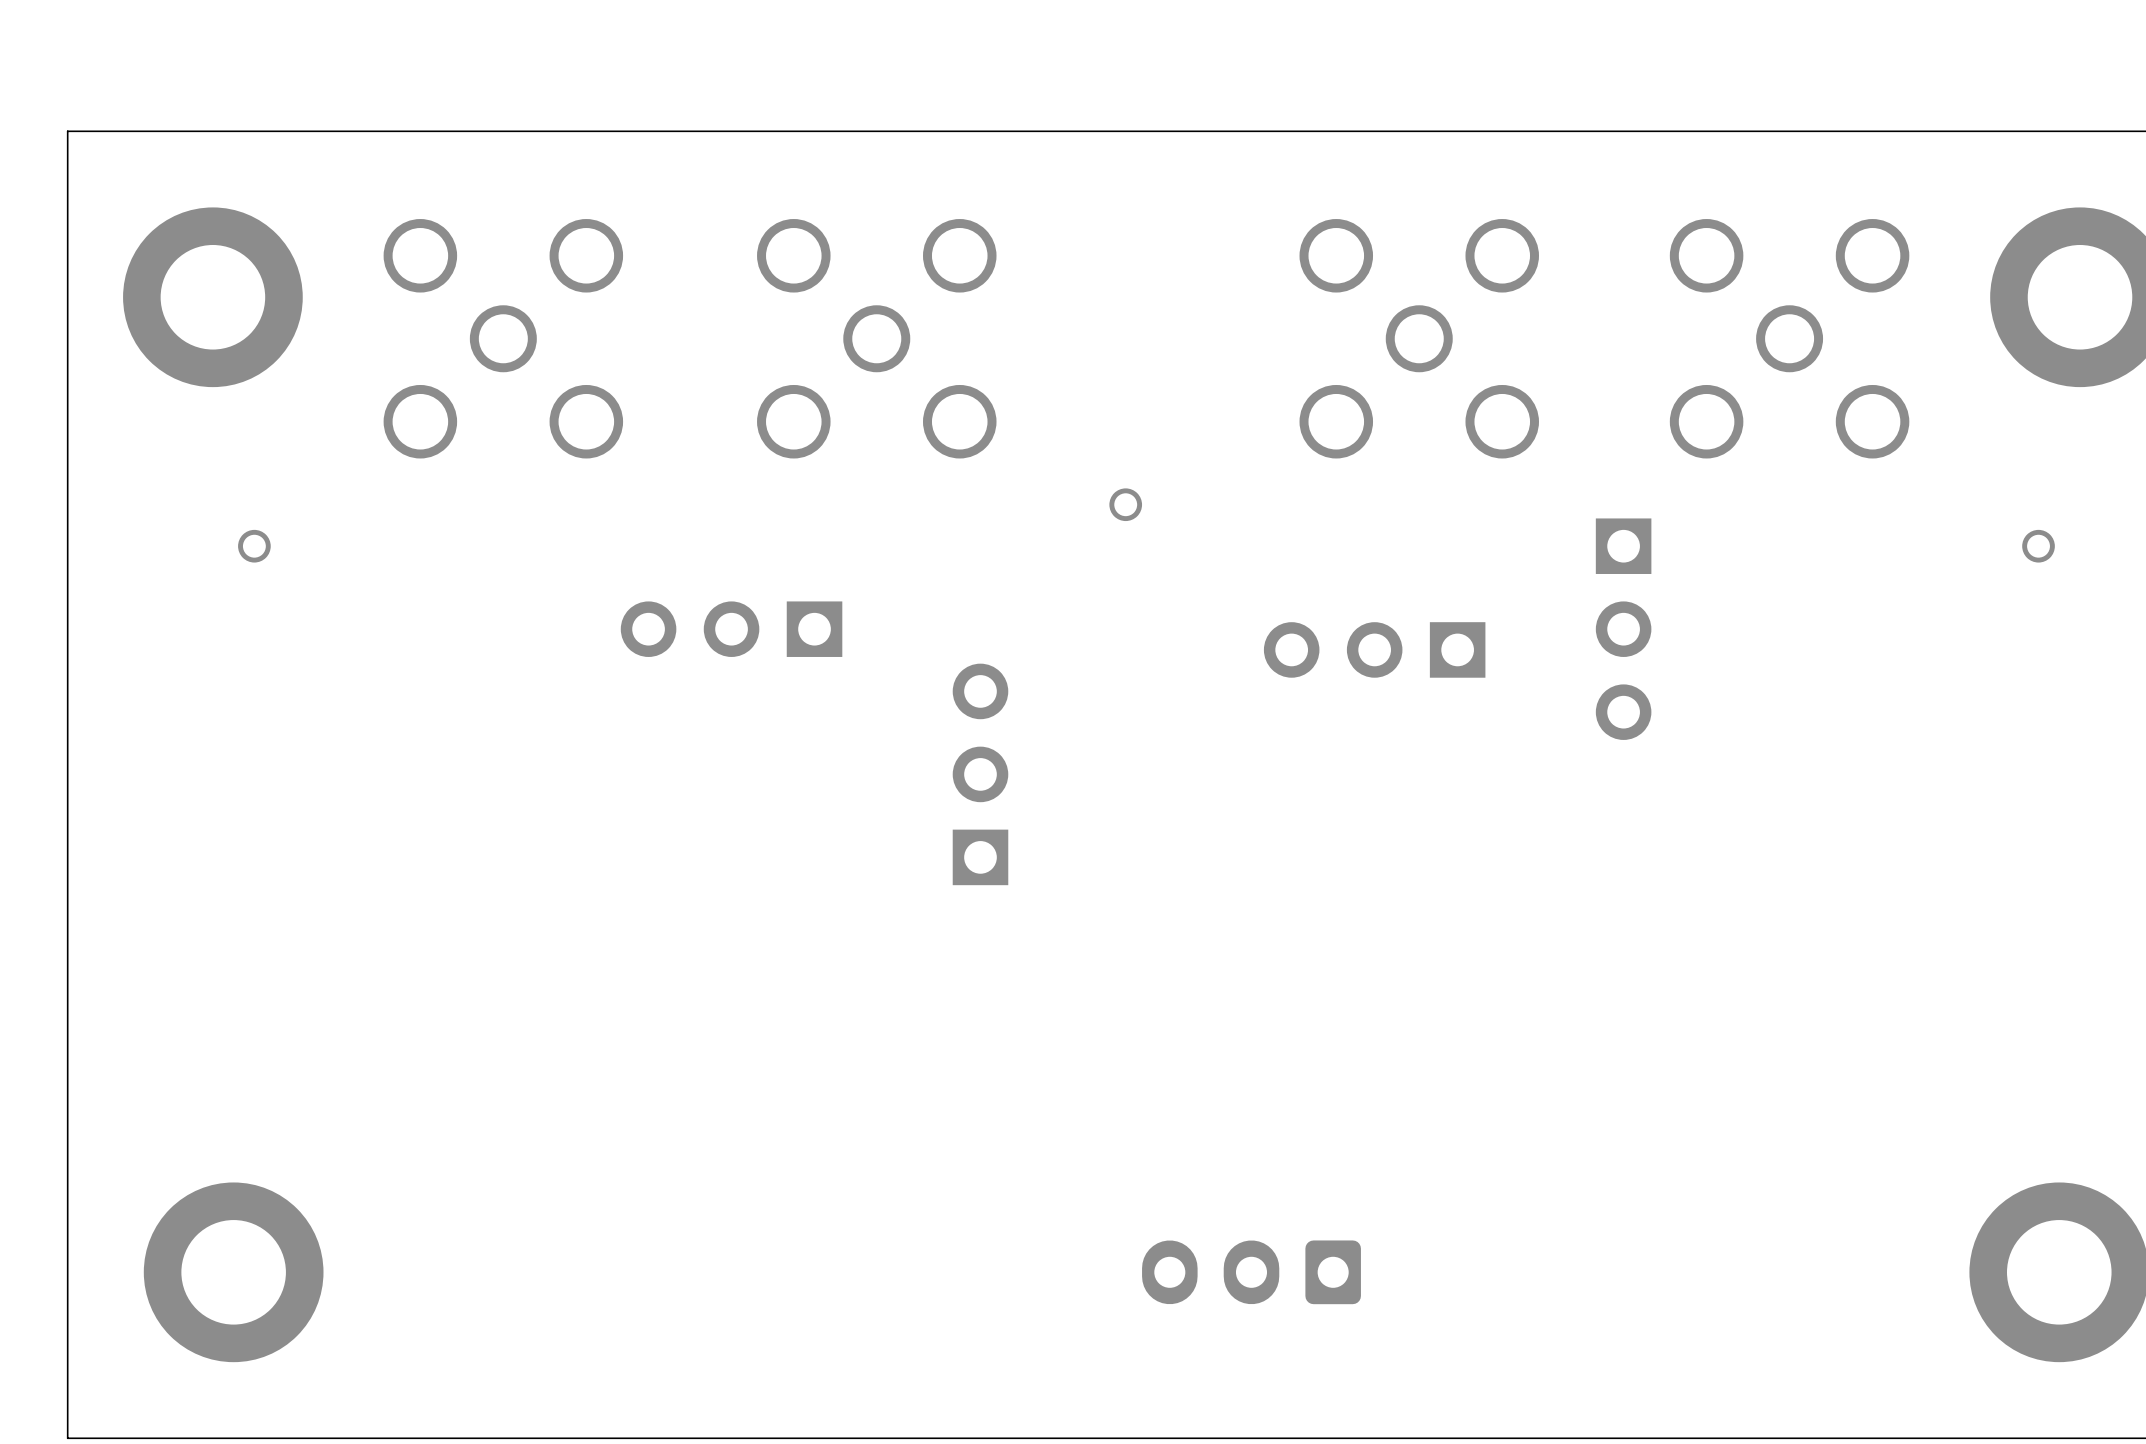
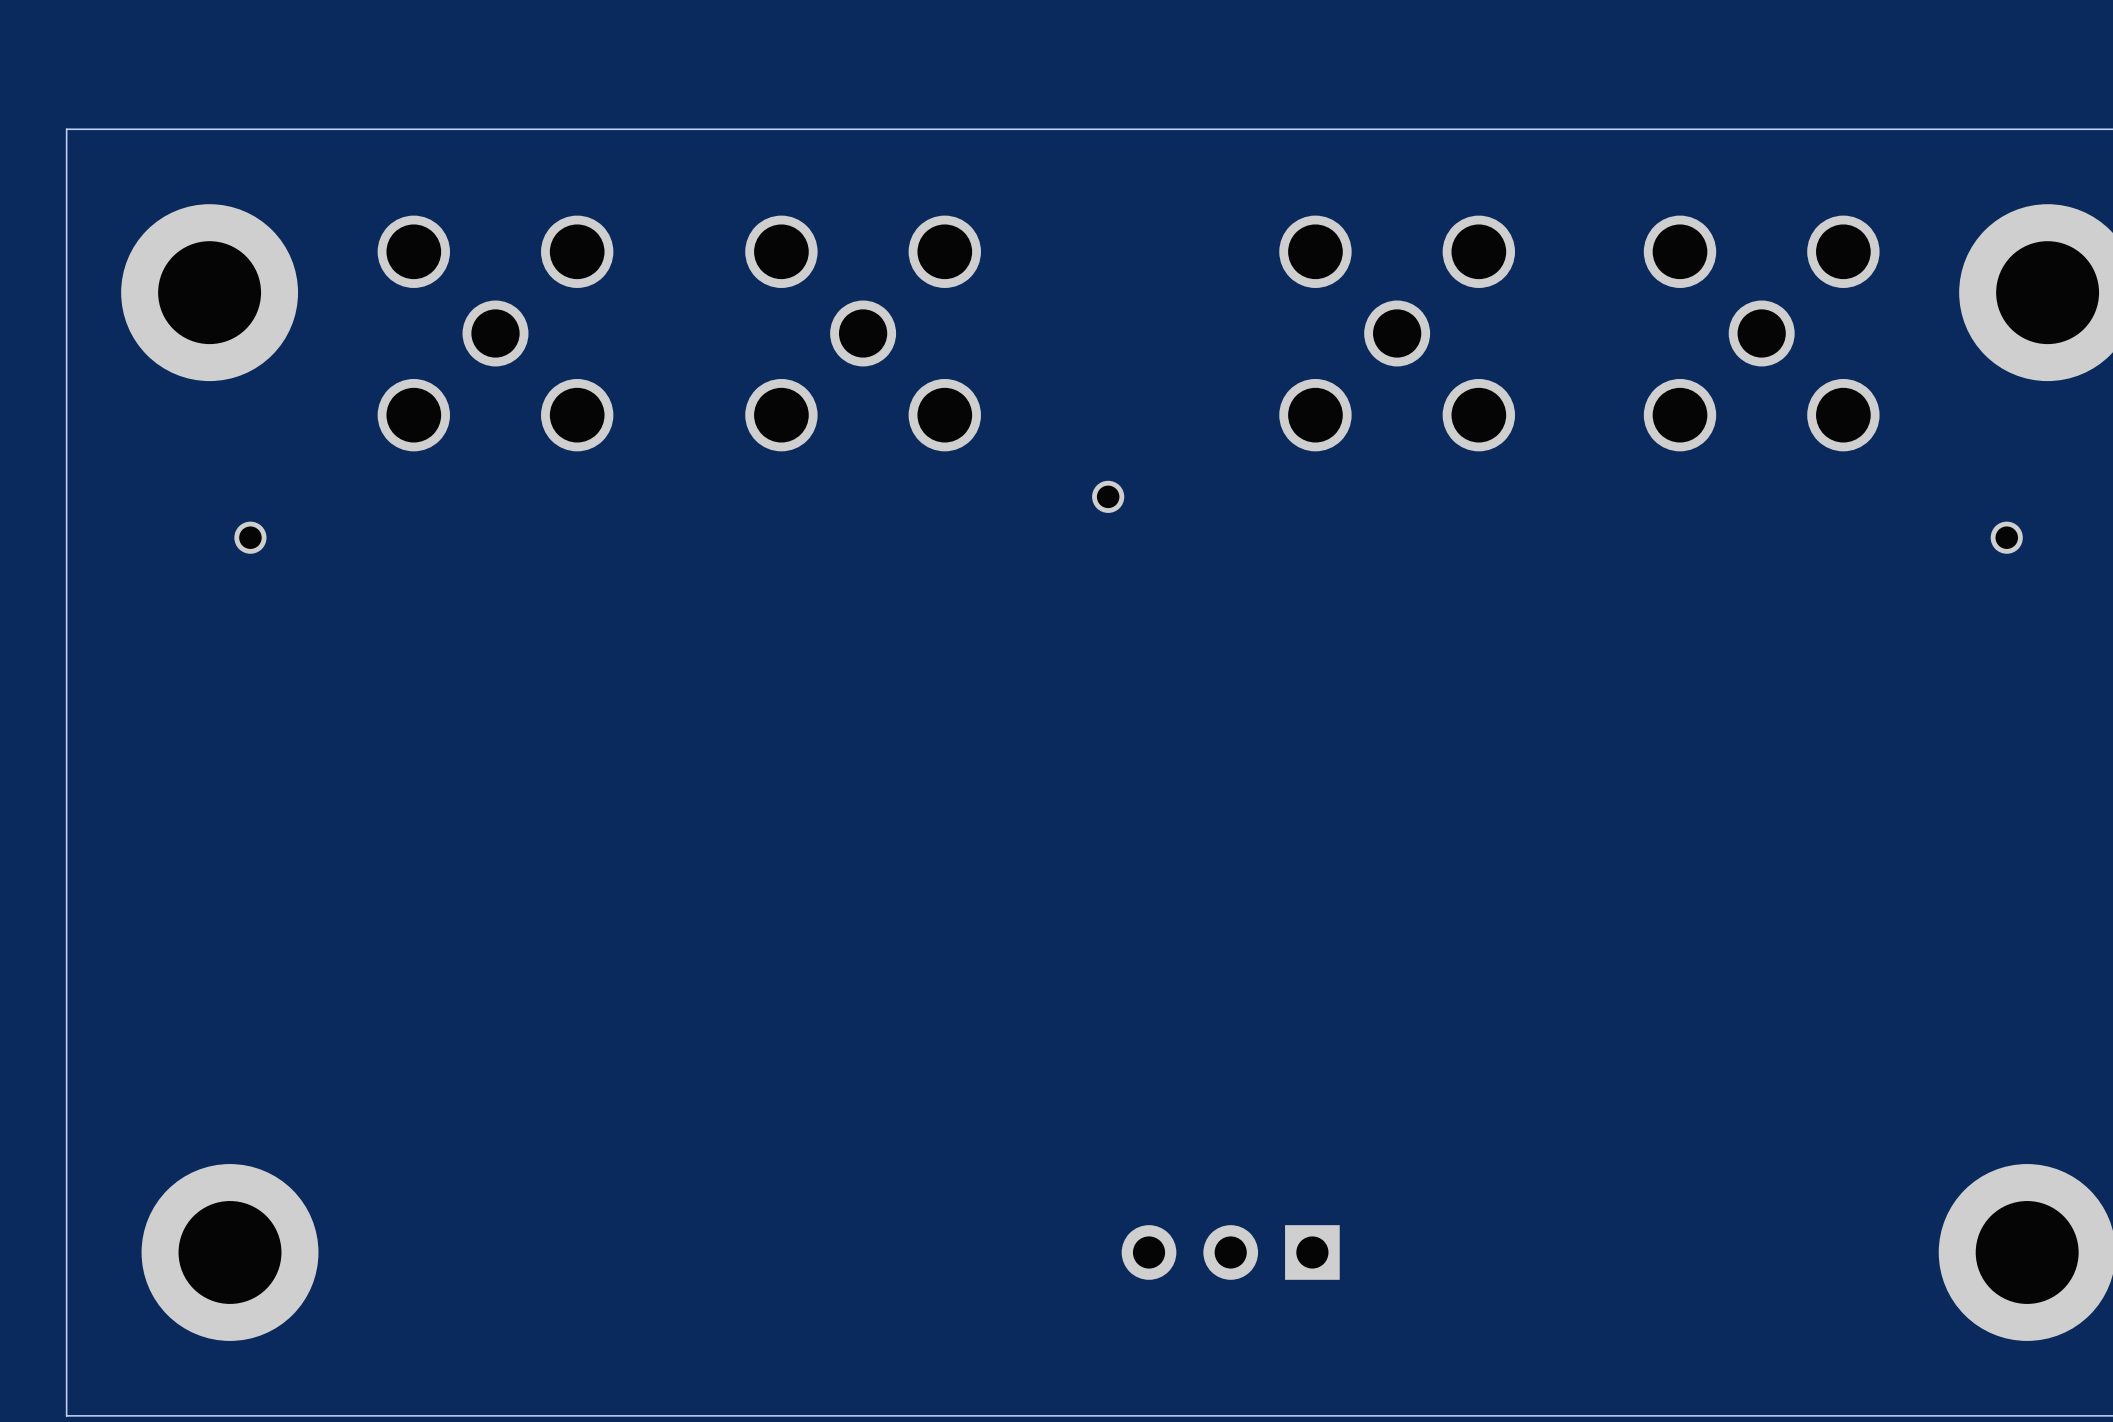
part: (731, 629) -> none
part: (1623, 629) -> none
part: (1374, 649) -> none
part: (980, 774) -> none
part footprint: [1142, 1240, 1361, 1305] -> [1121, 1225, 1340, 1280]

